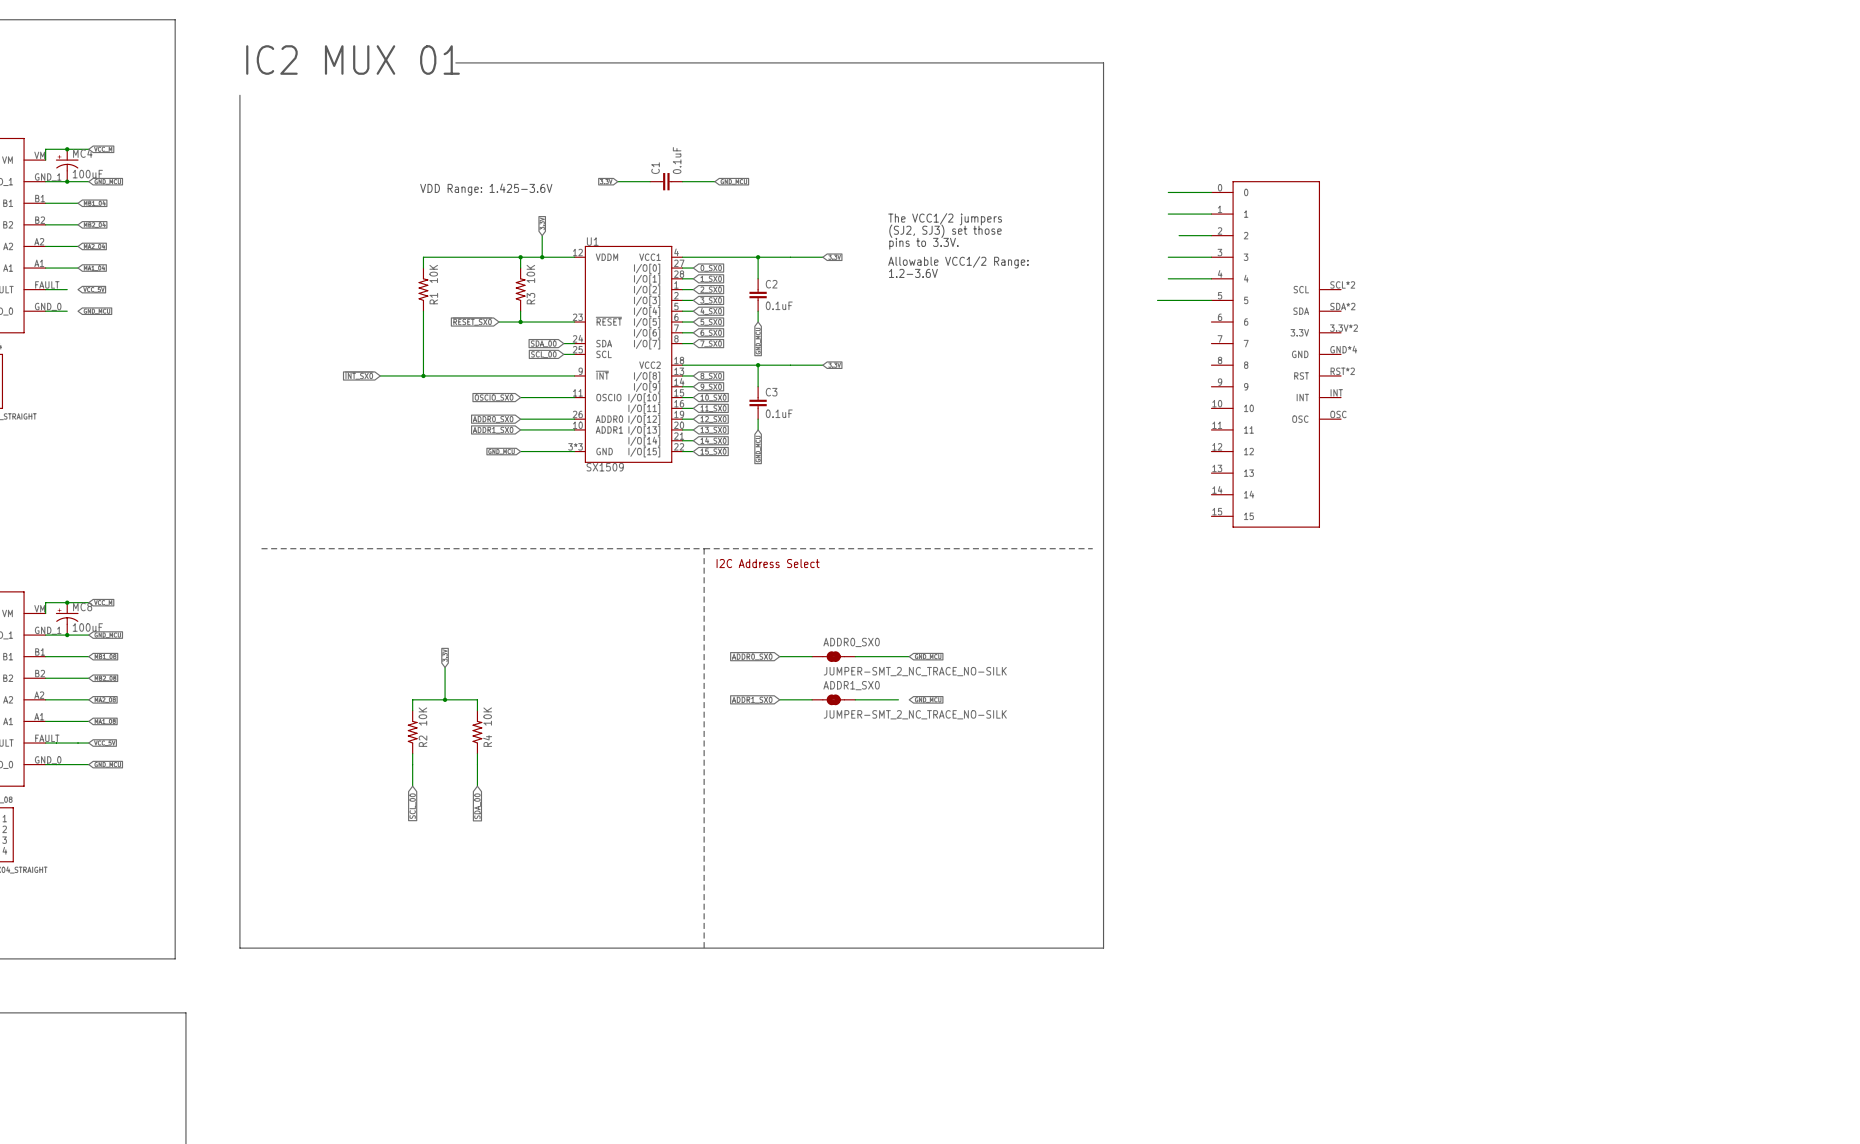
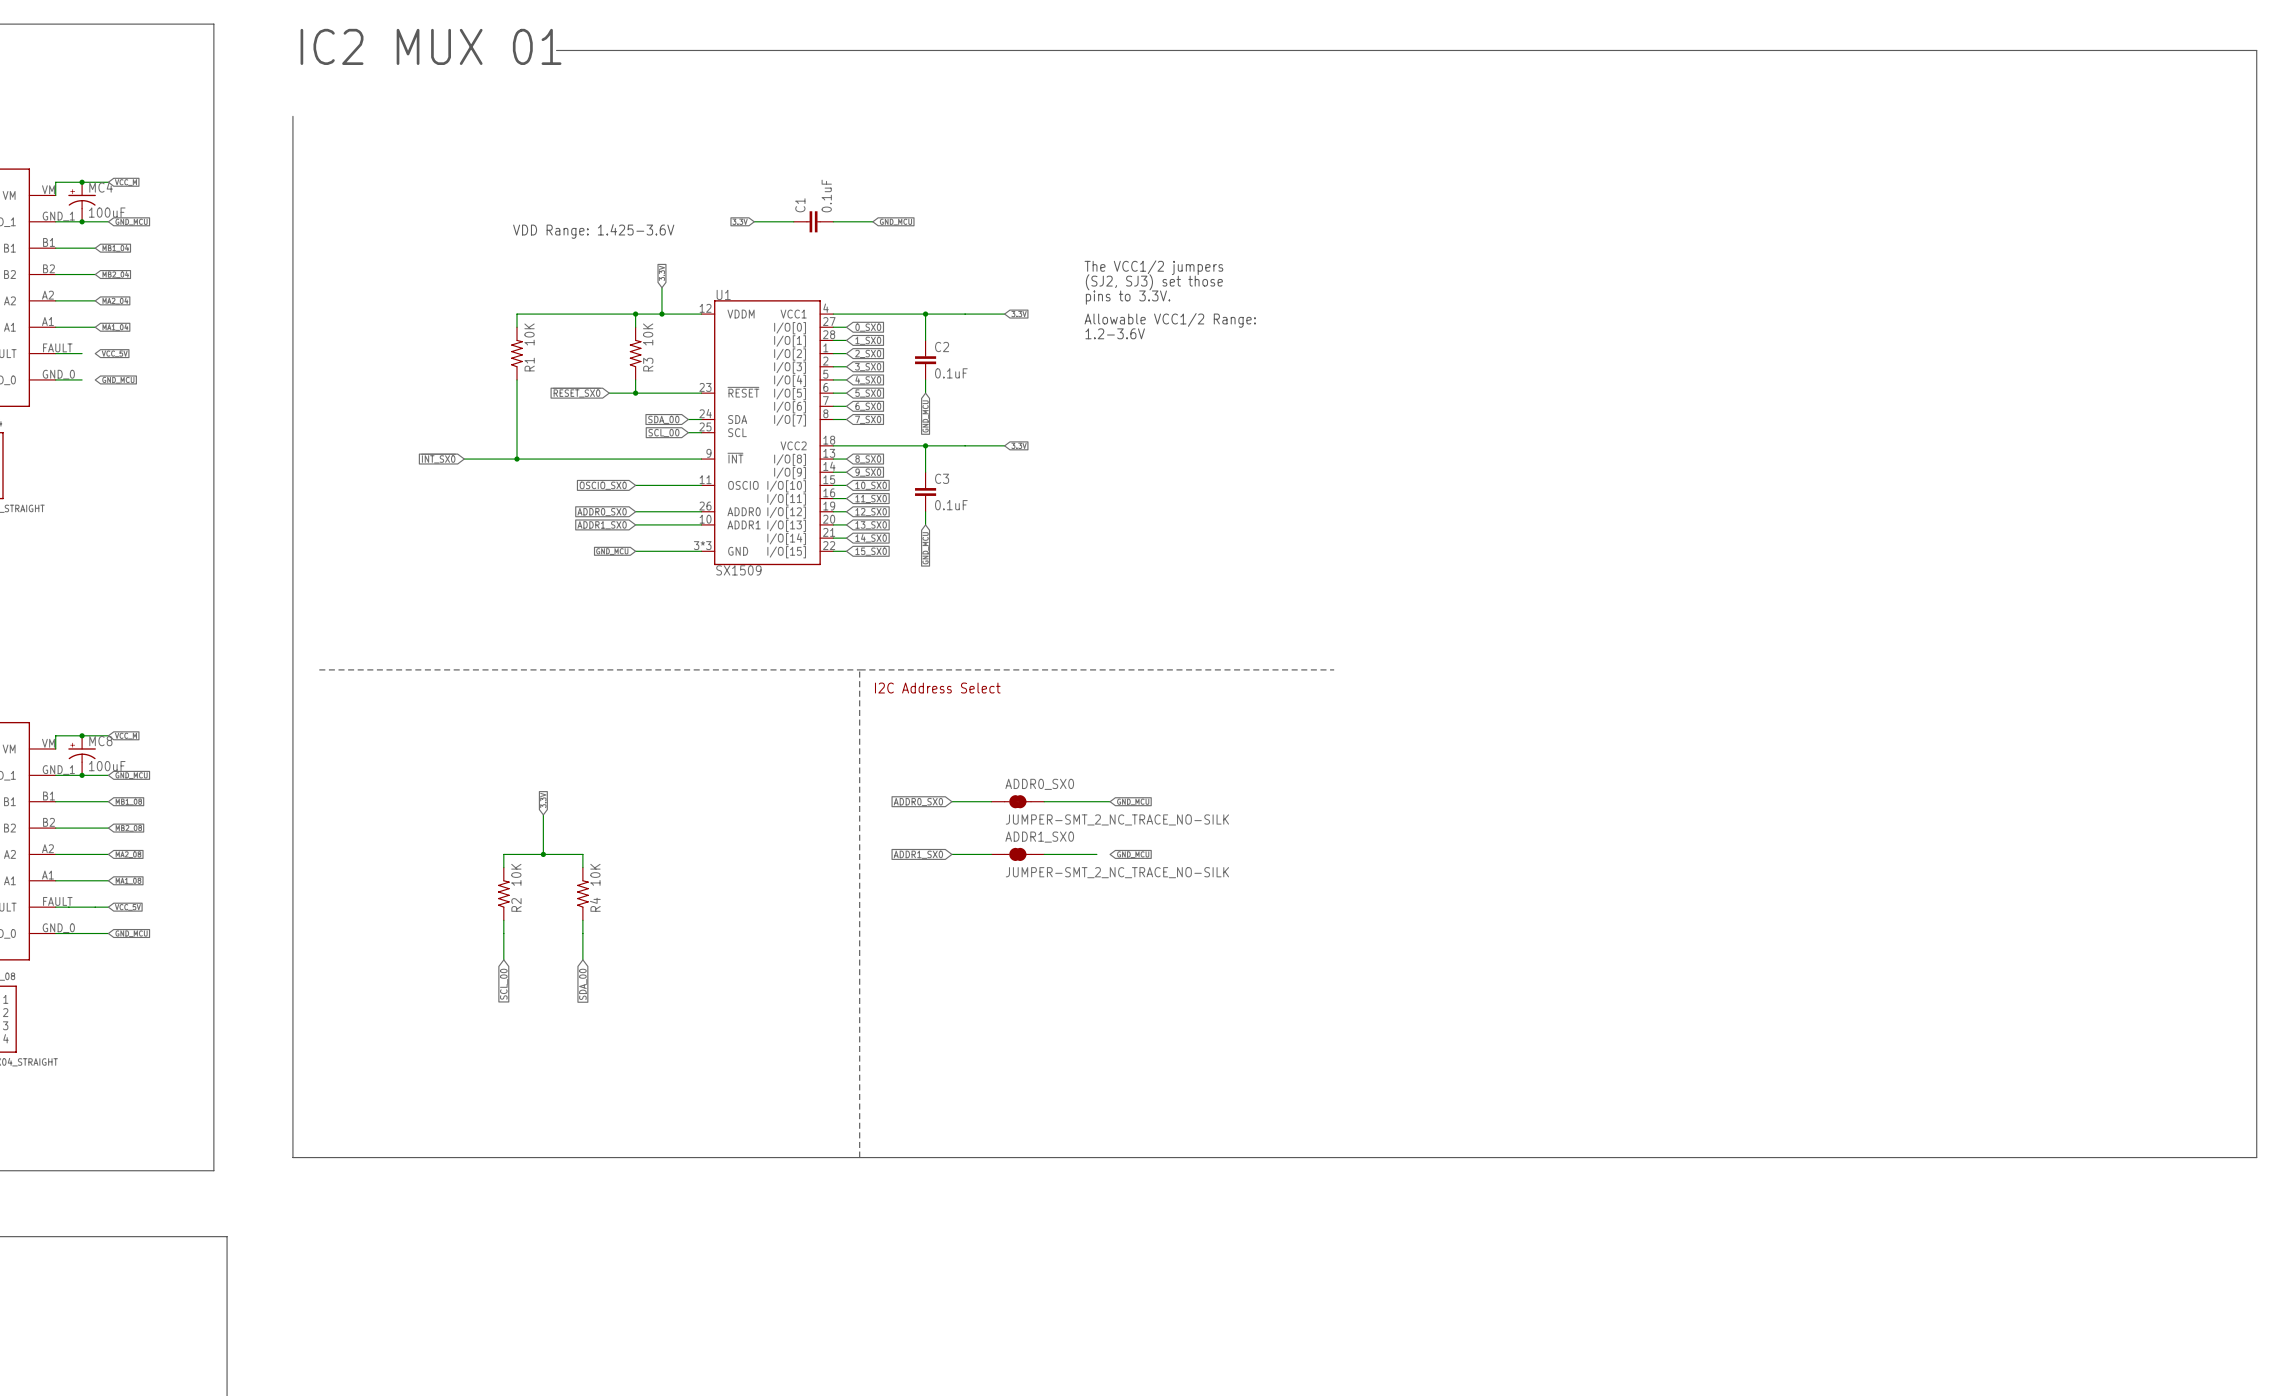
text position: IC2 MUX 01 (353, 60) -> IC2 MUX 01 (431, 46)
line: (455, 62) (1103, 62) (1103, 948) -> (556, 50) (2256, 50) (2256, 1157) (1347, 1157)
wire: (1168, 192) (1211, 192) -> none
wire: (1168, 214) (1211, 214) -> none
wire: (1179, 235) (1211, 235) -> none
wire: (1168, 257) (1211, 257) -> none
wire: (1168, 278) (1211, 278) -> none
wire: (1157, 300) (1211, 300) -> none
part: (1276, 354) -> none

